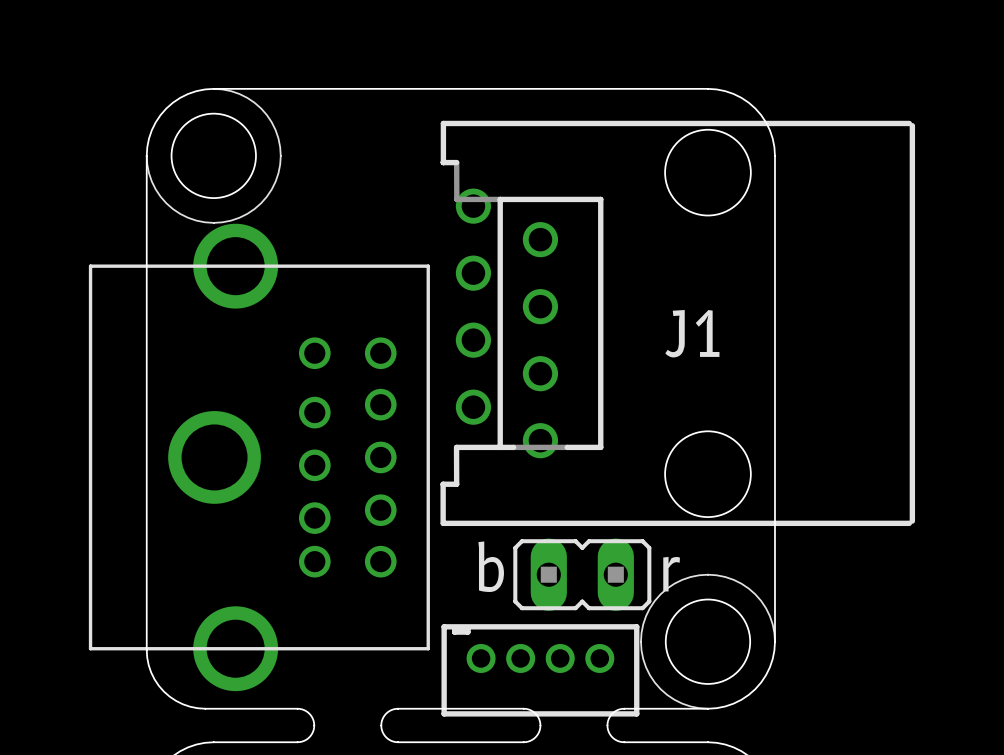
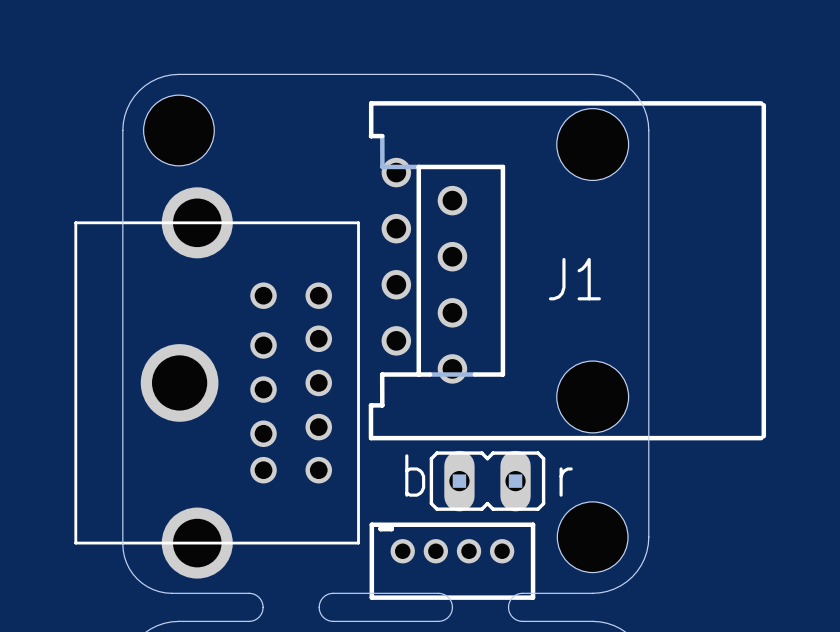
line: (213, 88) (231, 91) (254, 102) (266, 115) (275, 130) (280, 147) (278, 173) (271, 189) (261, 203) (247, 213) (231, 220) (205, 222) (188, 217) (172, 209) (160, 196) (149, 173) (146, 155) -> none
line: (774, 641) (772, 624) (761, 600) (748, 588) (733, 579) (716, 575) (690, 576) (674, 583) (660, 594) (649, 608) (643, 624) (641, 650) (646, 667) (654, 682) (667, 694) (690, 706) (707, 708) -> none

